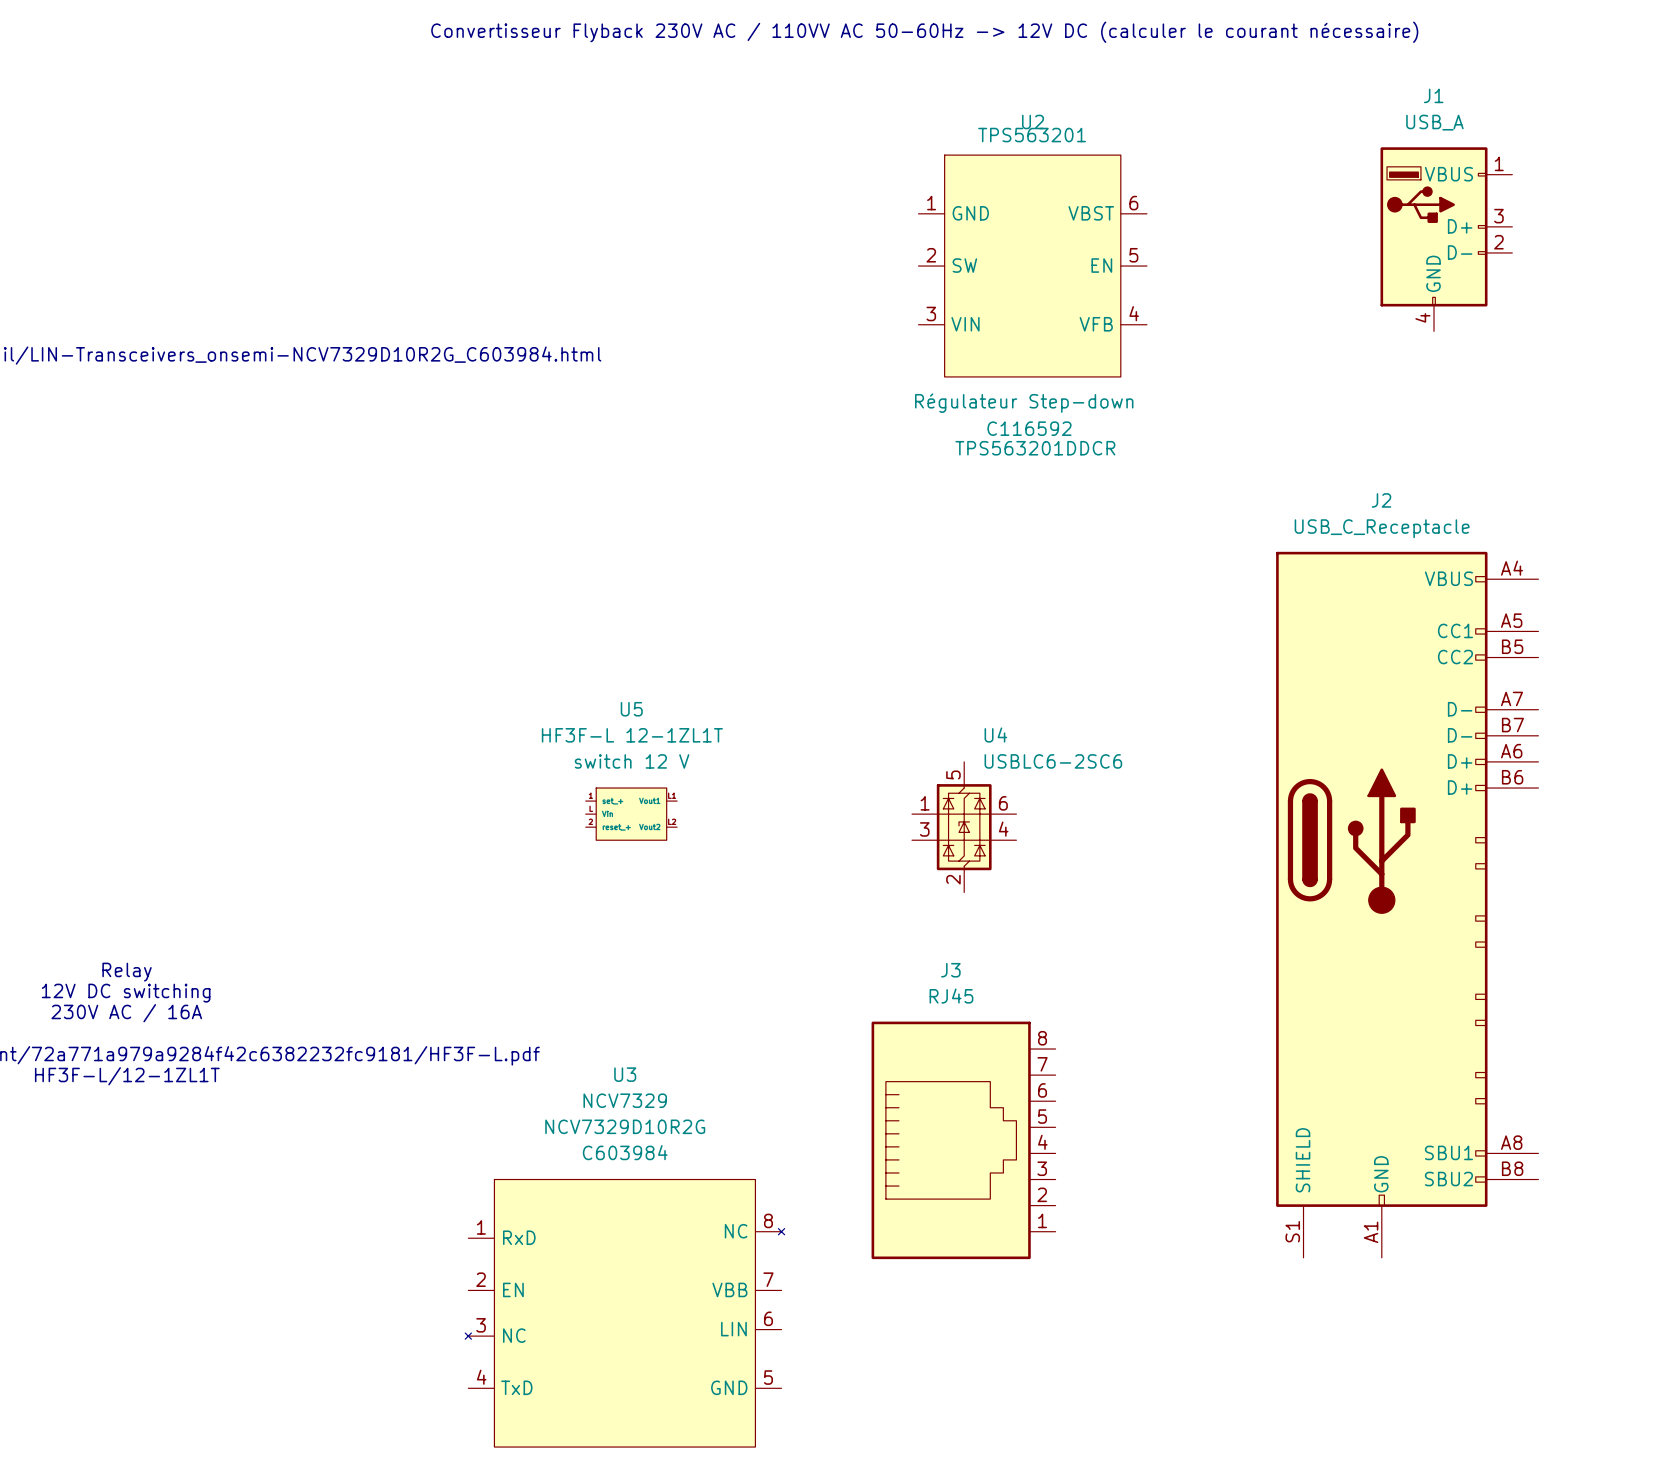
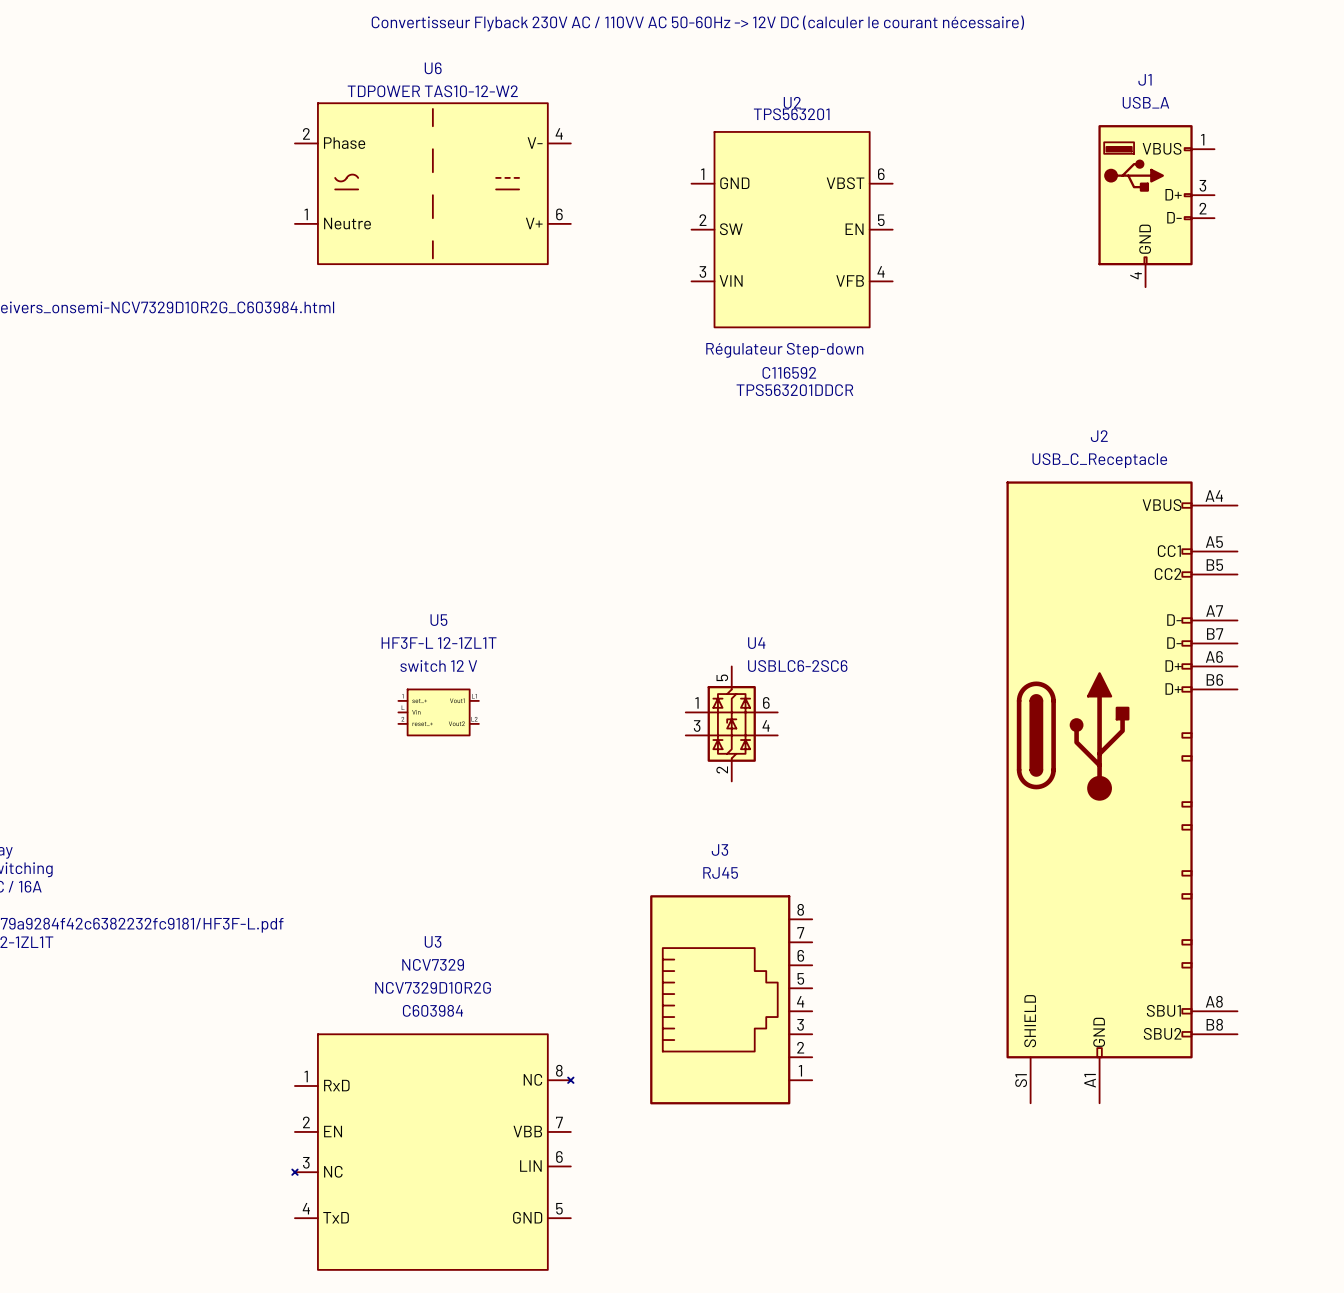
U6: none -> TDPOWER TAS10-12-W2 (432, 183)

